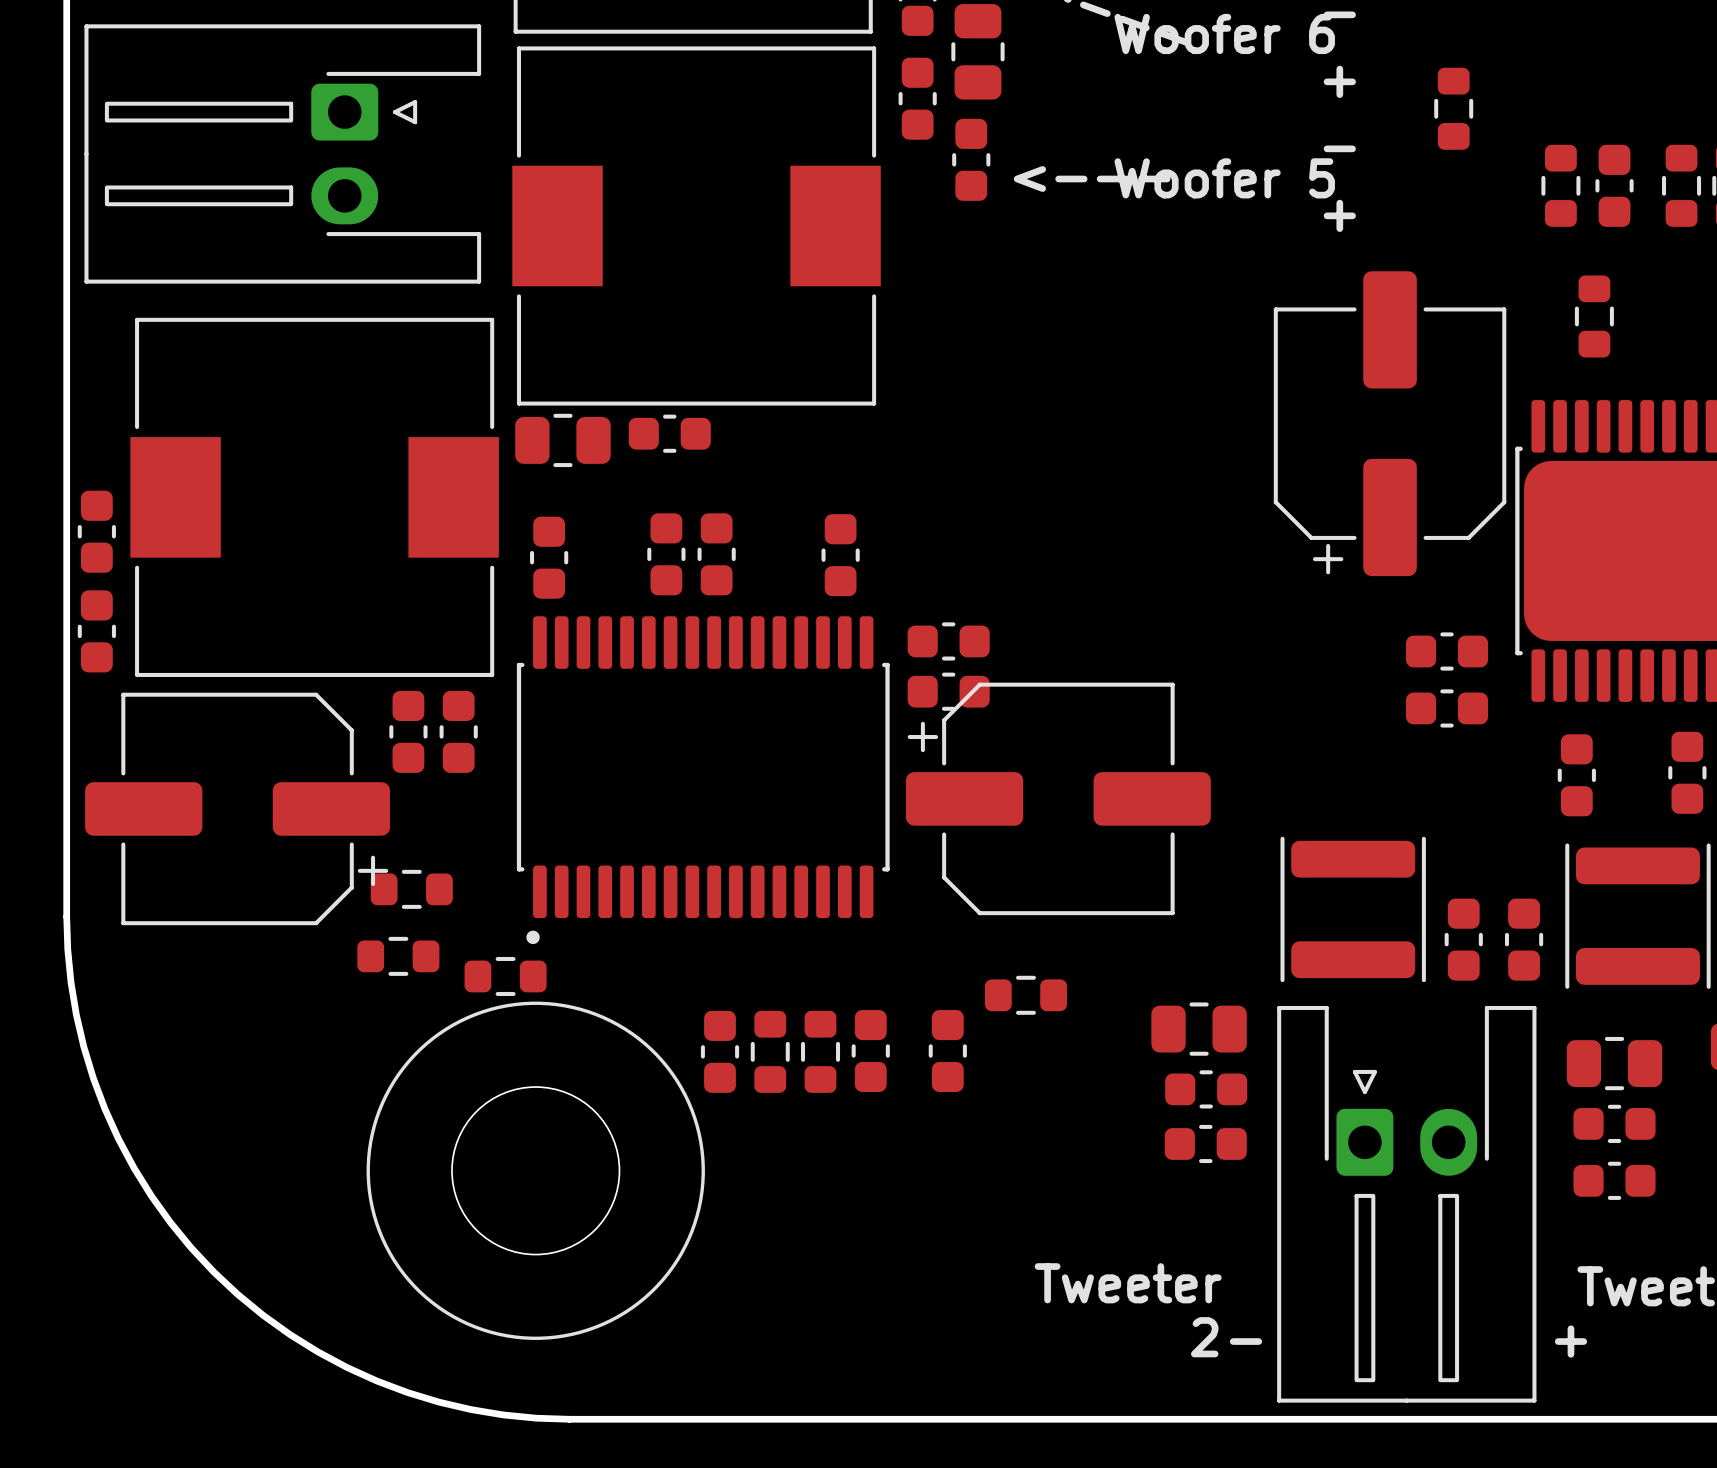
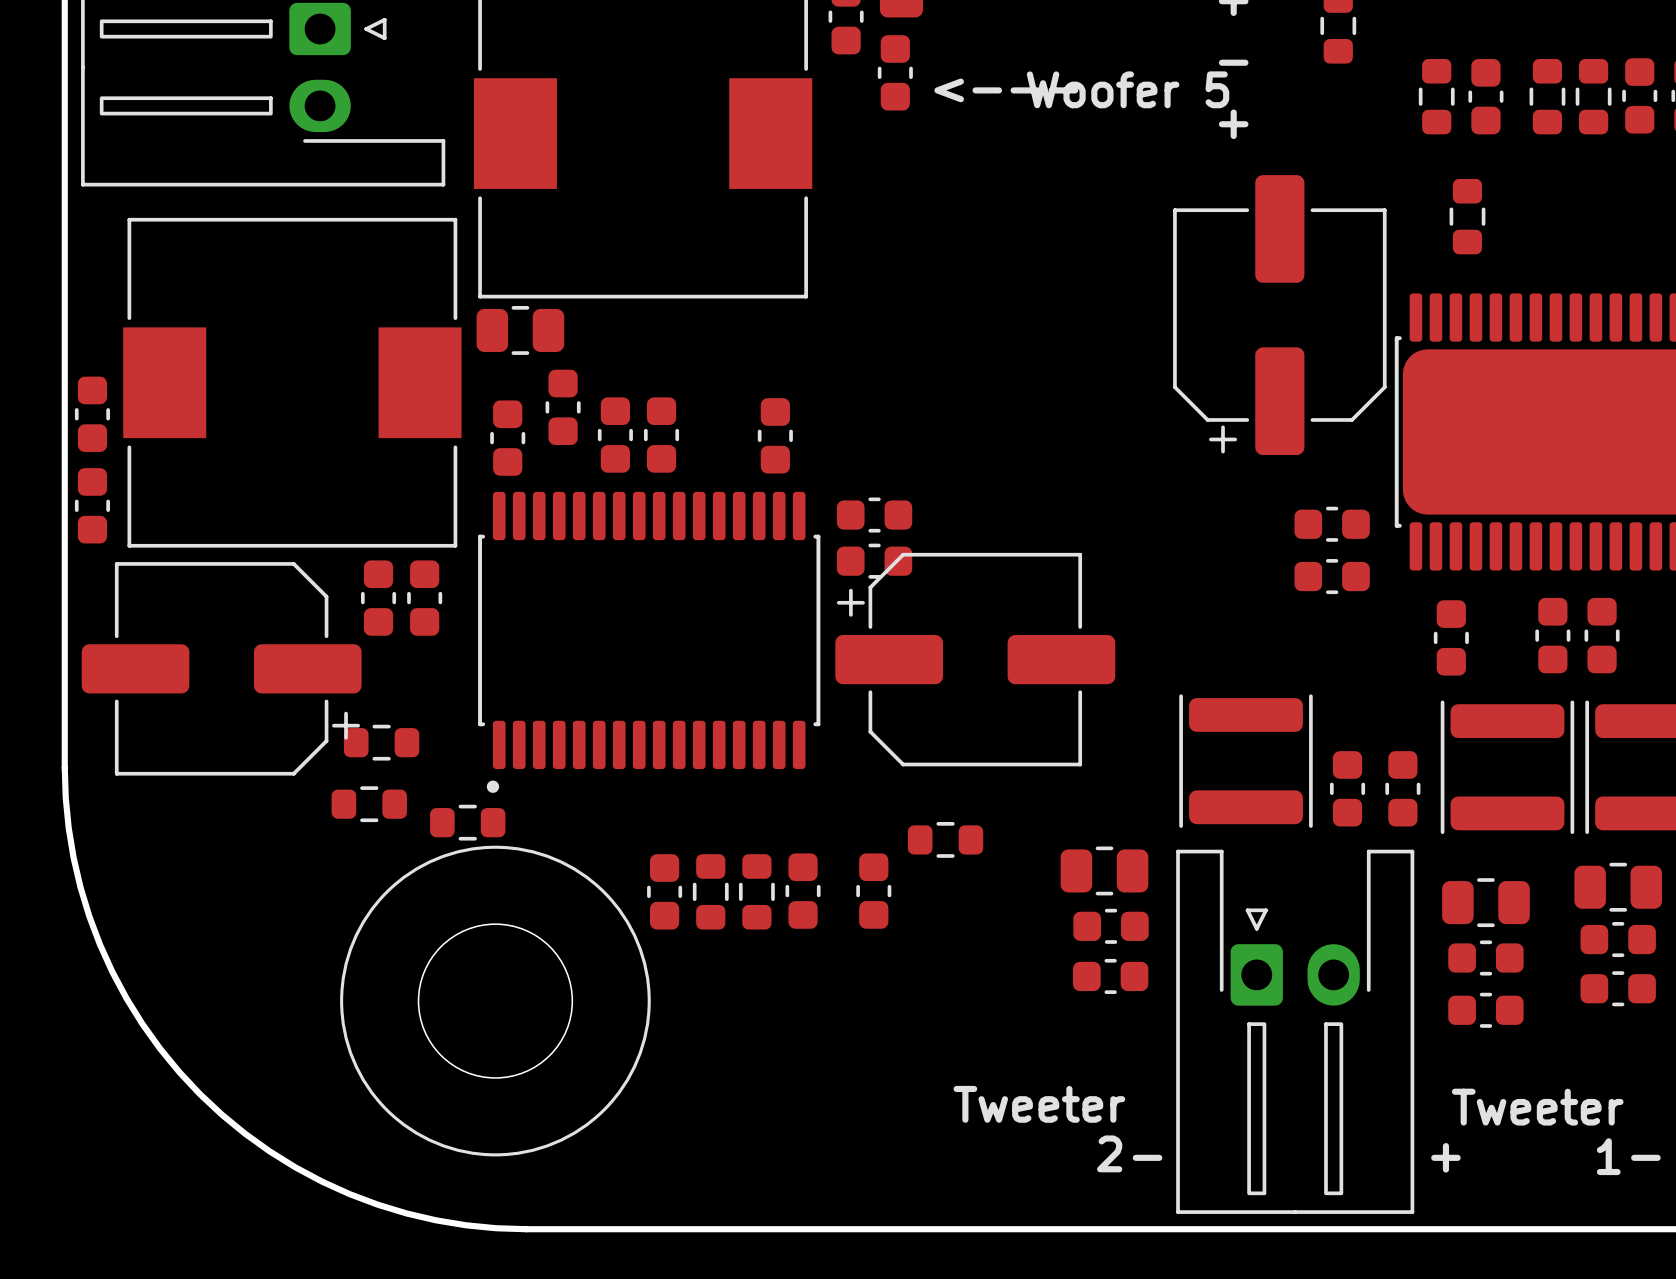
part rotation: 0° (669, 433) -> 90° clockwise (563, 407)
part position: (669, 433) -> (563, 407)

